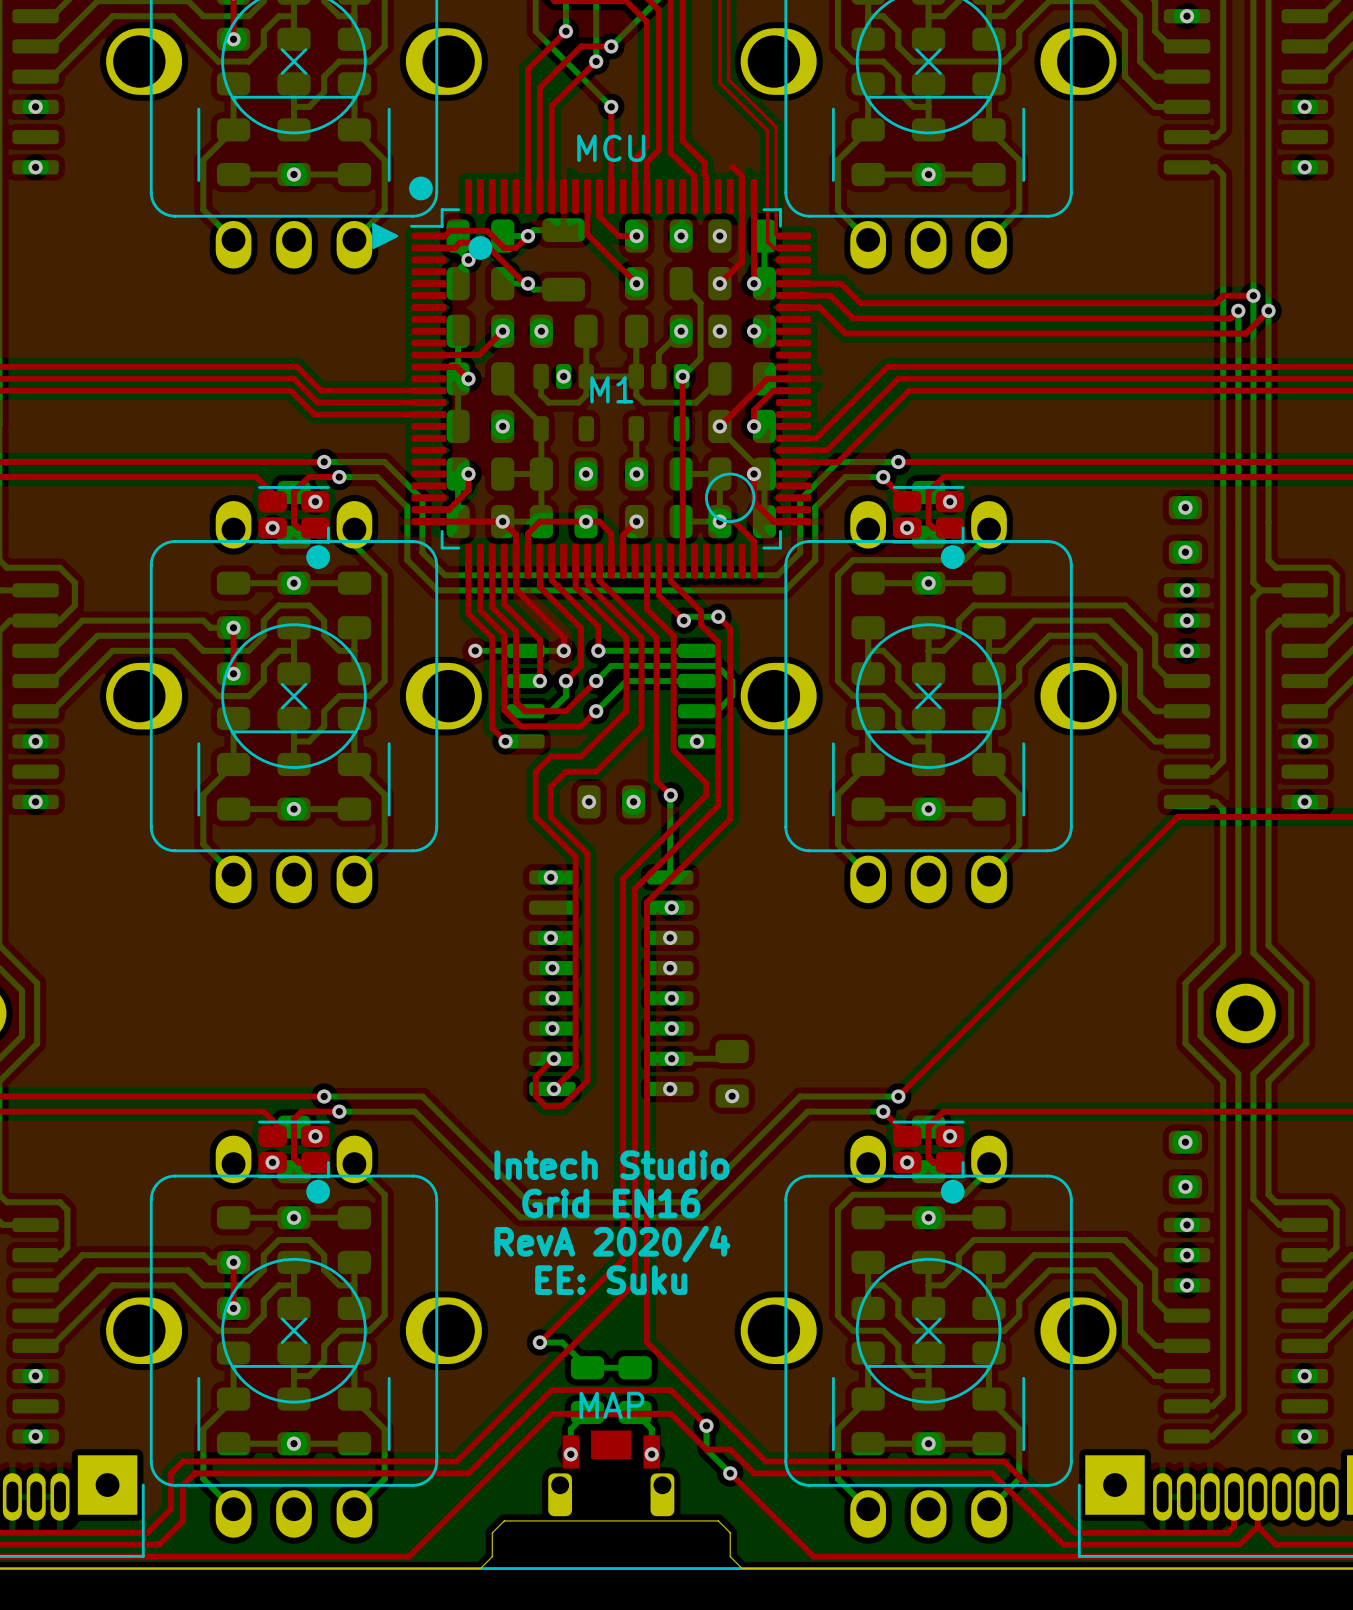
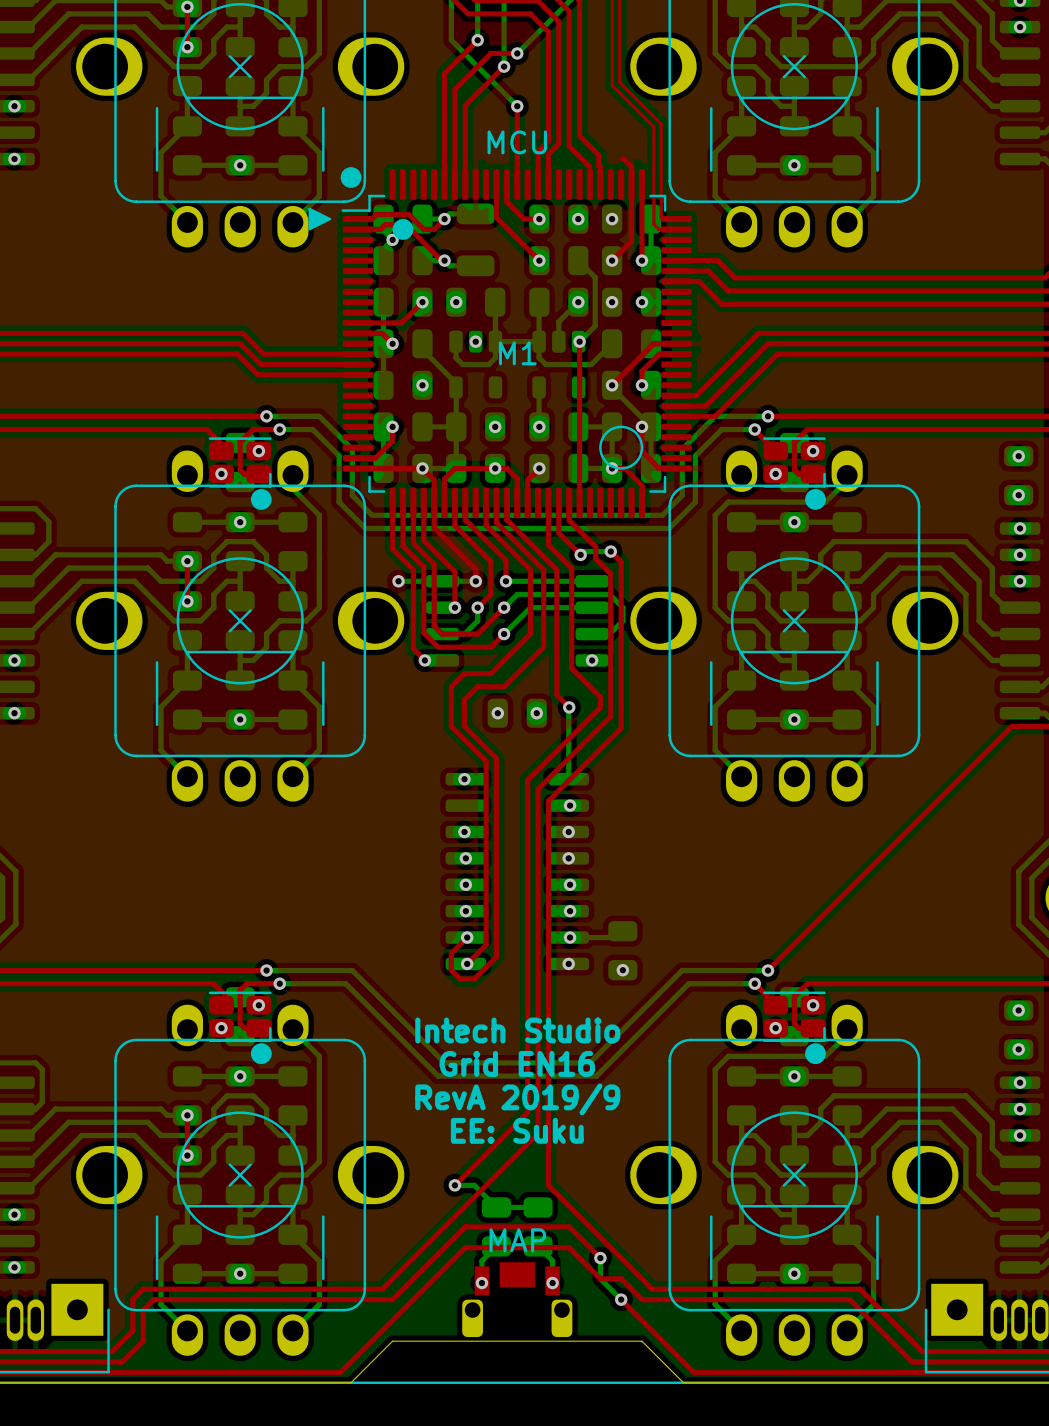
text: RevA 2020/4 (612, 1244) -> RevA 2019/9 (517, 1099)
board edge: (504, 1520) (492, 1532) (492, 1556) (480, 1568) (420, 1568) -> (423, 1341) (392, 1341) (351, 1382)
board edge: (718, 1520) (730, 1532) (730, 1556) (742, 1568) (801, 1568) -> (610, 1341) (641, 1341) (683, 1382)

